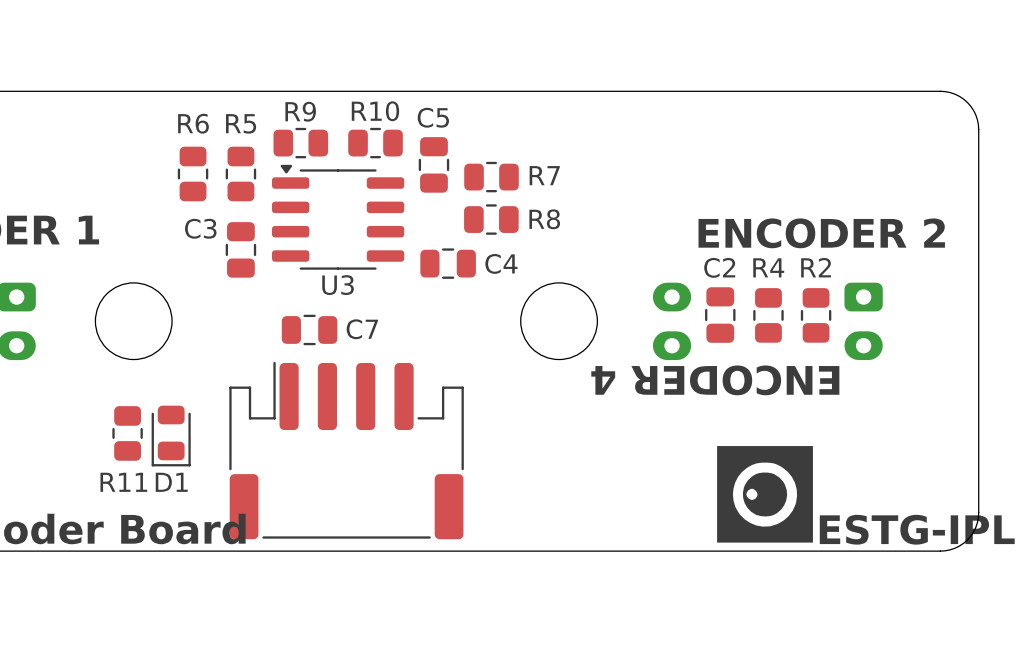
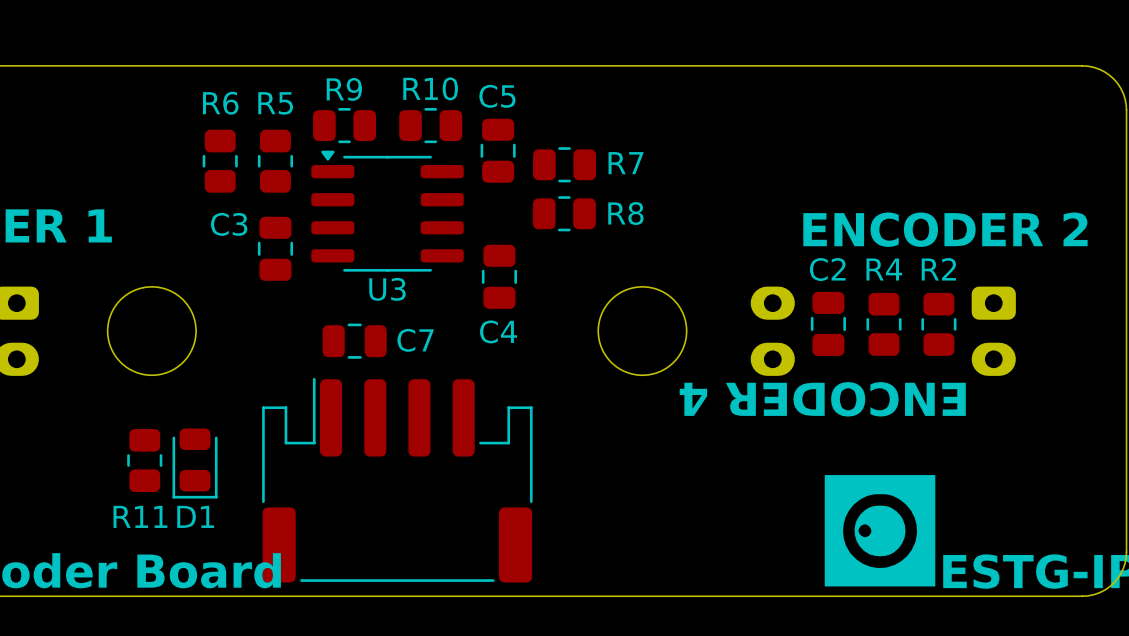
C4 rotation: 0° (448, 263) -> 90° clockwise (499, 276)

